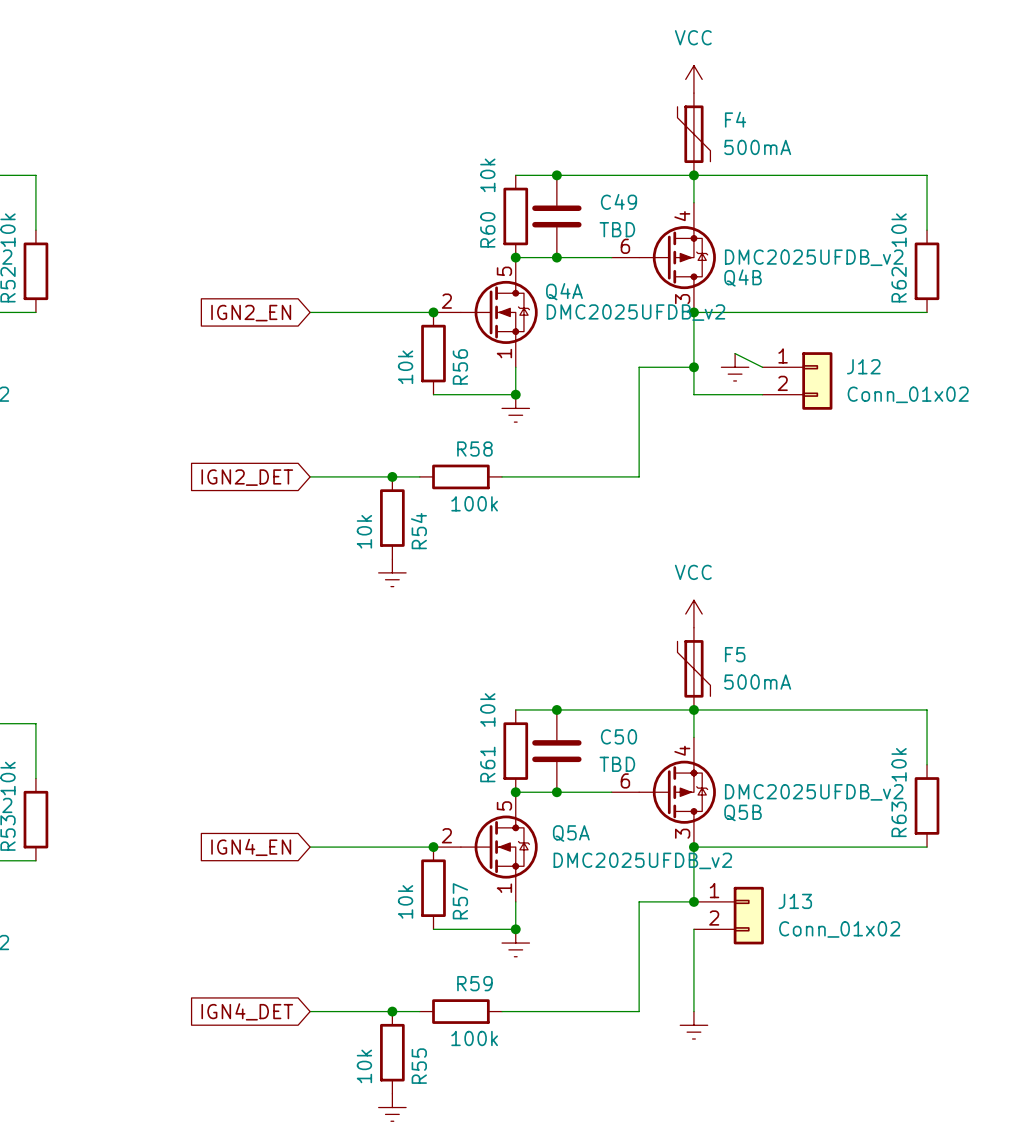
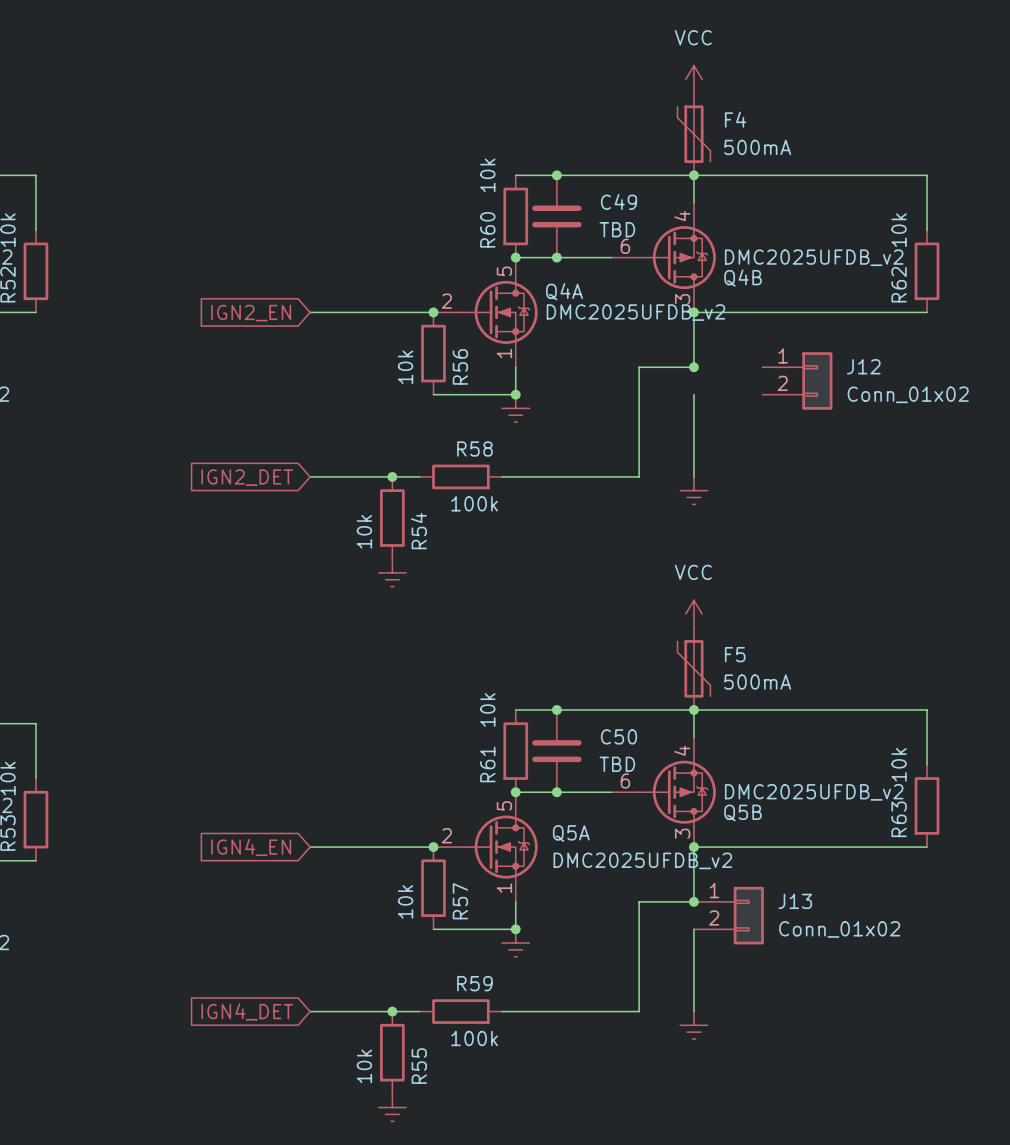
wire: (735, 353) (762, 367) -> none
wire: (693, 367) (693, 394) (762, 394) -> none
power symbol position: (735, 367) -> (693, 490)
wire: none -> (693, 394) (693, 476)

